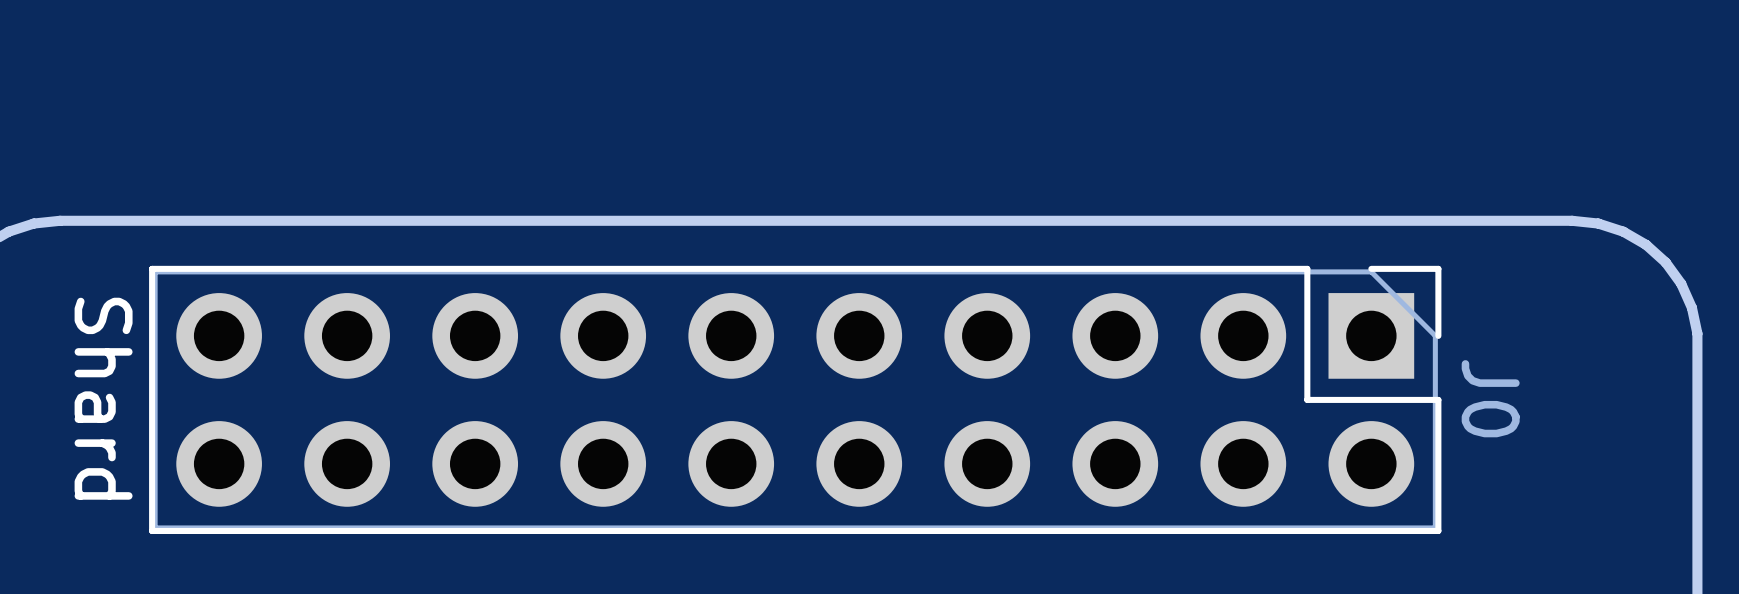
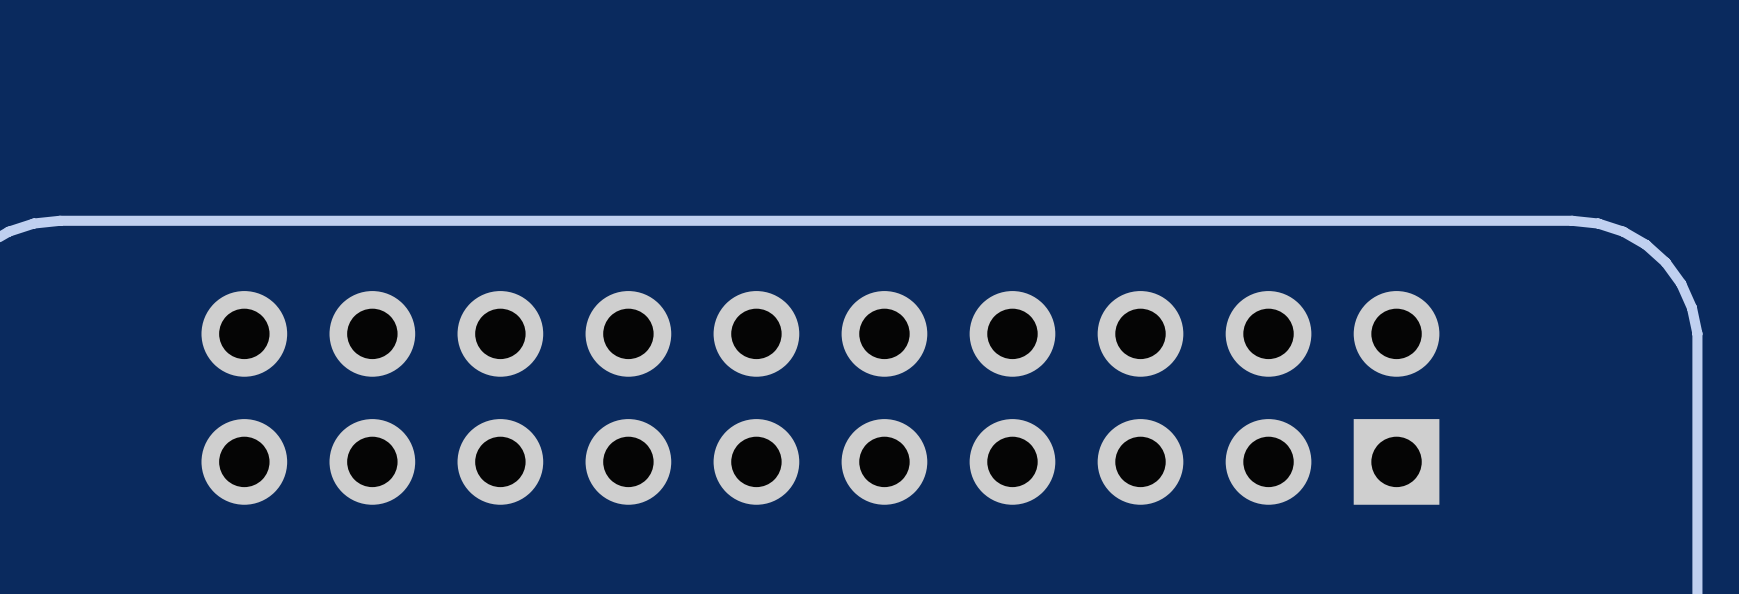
J0 side: bottom (795, 399) -> top (820, 397)

